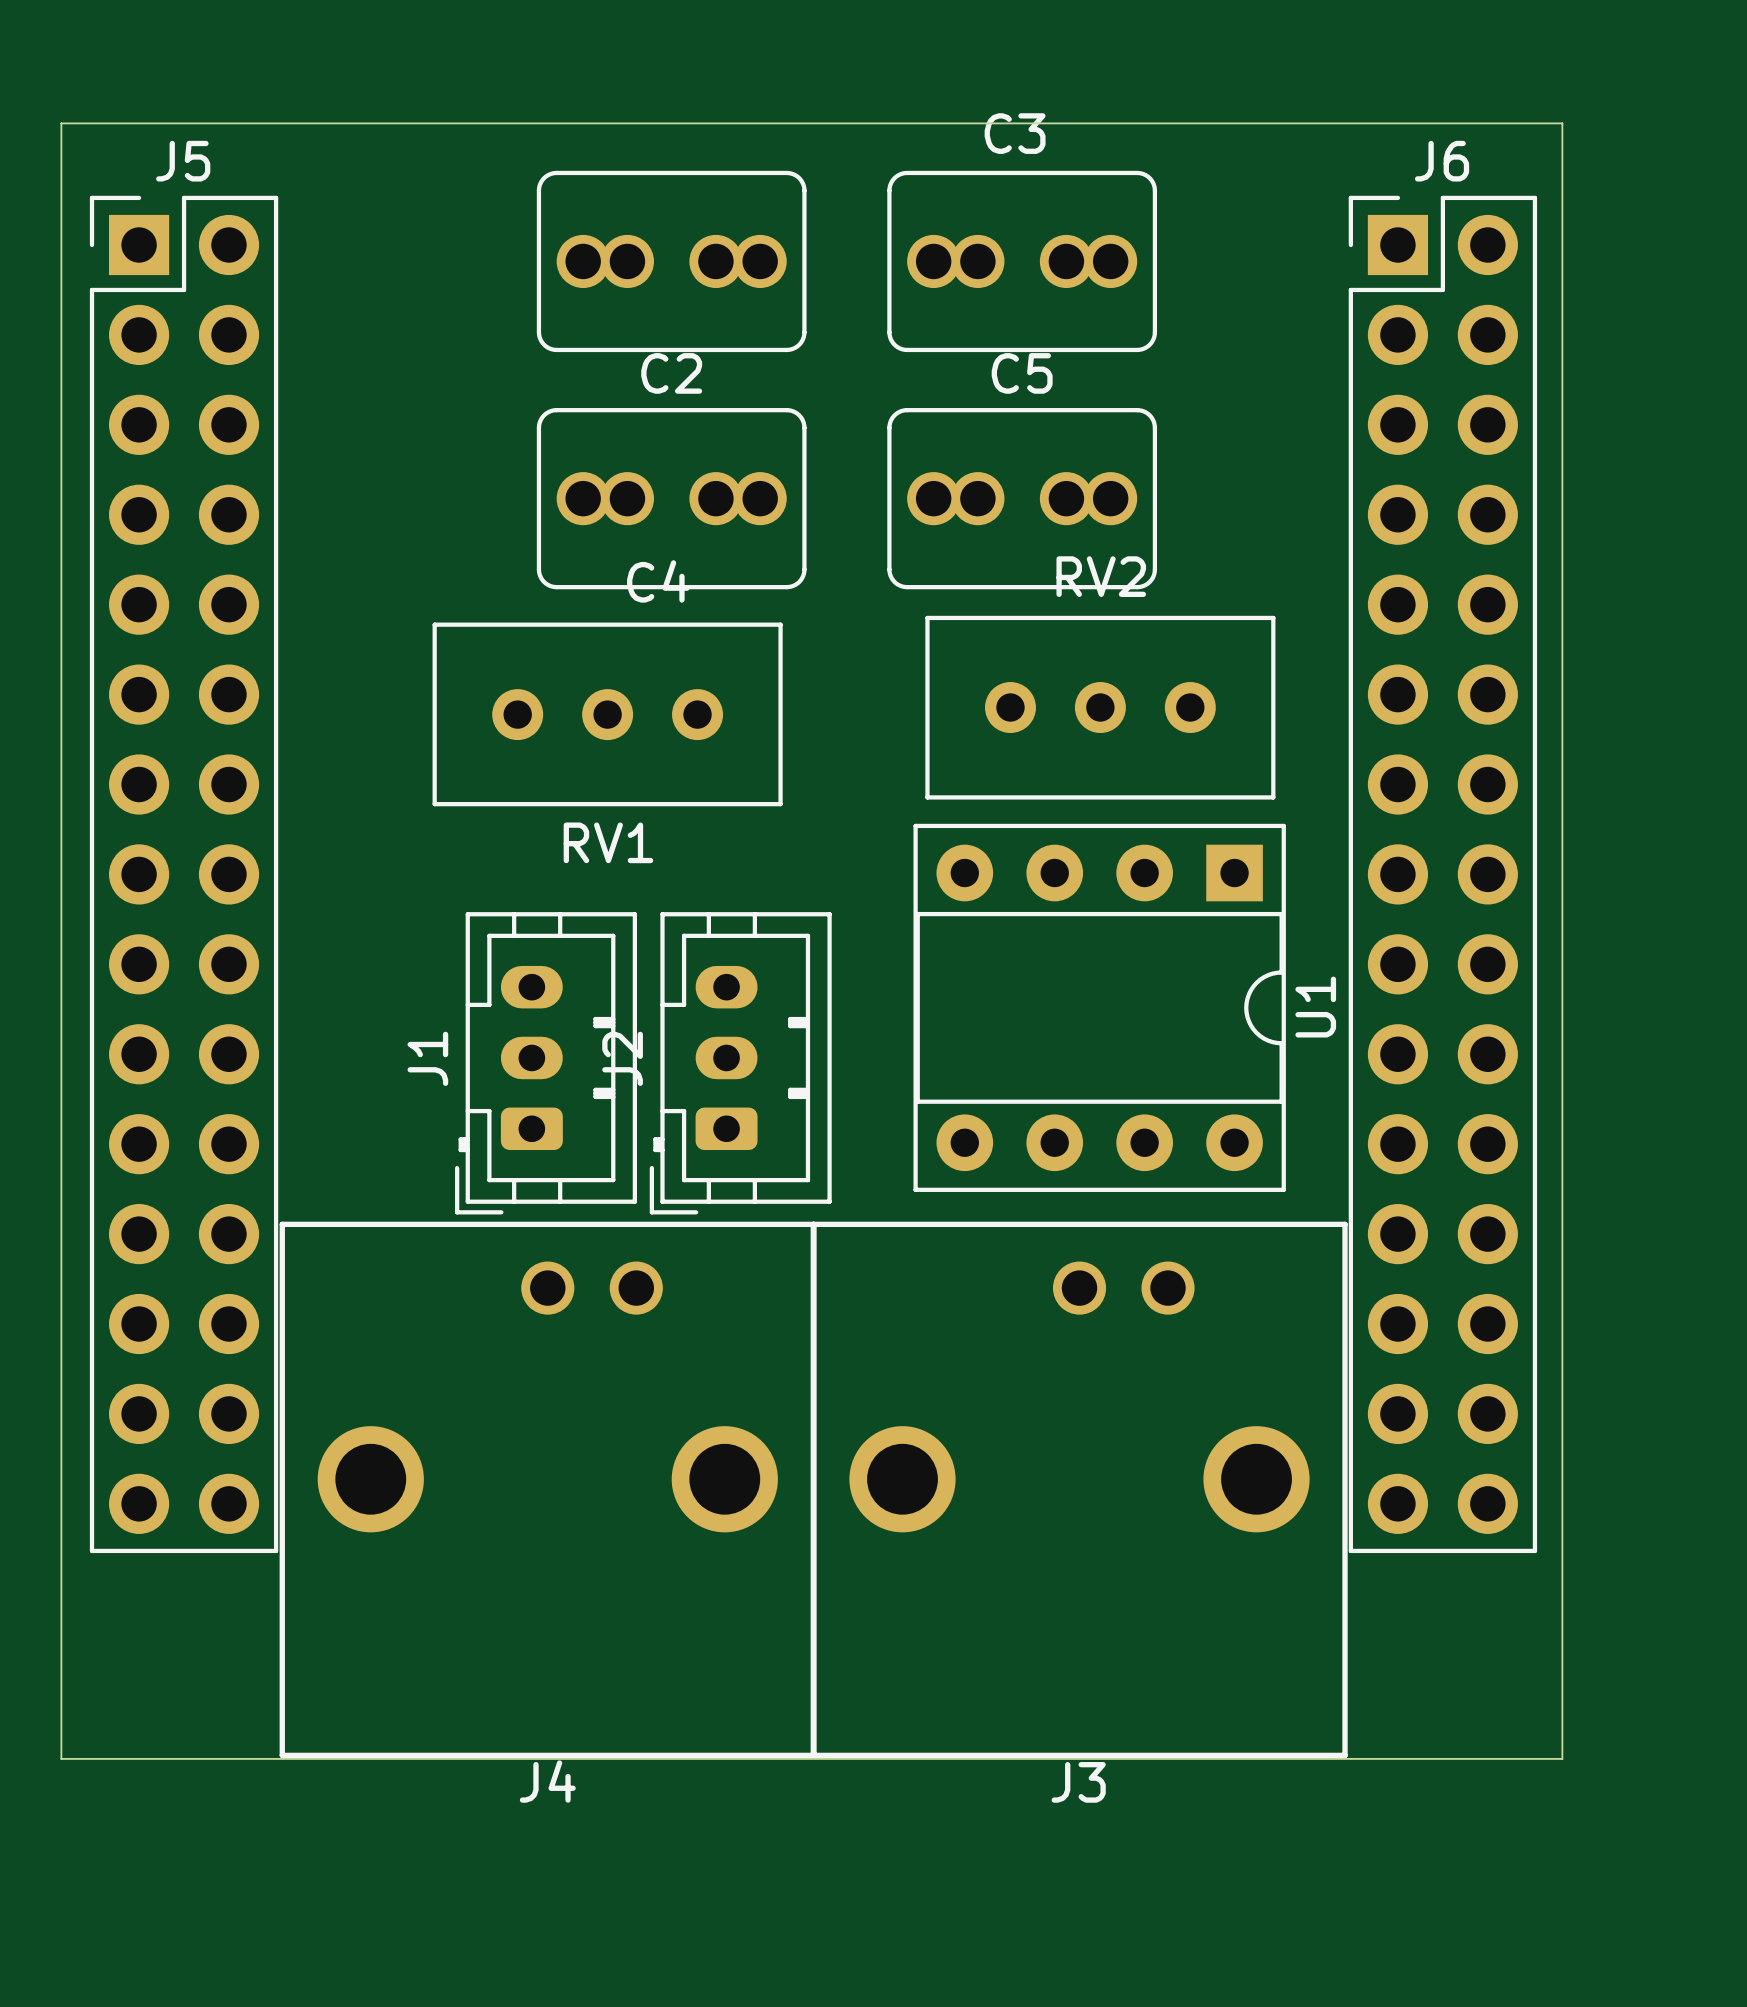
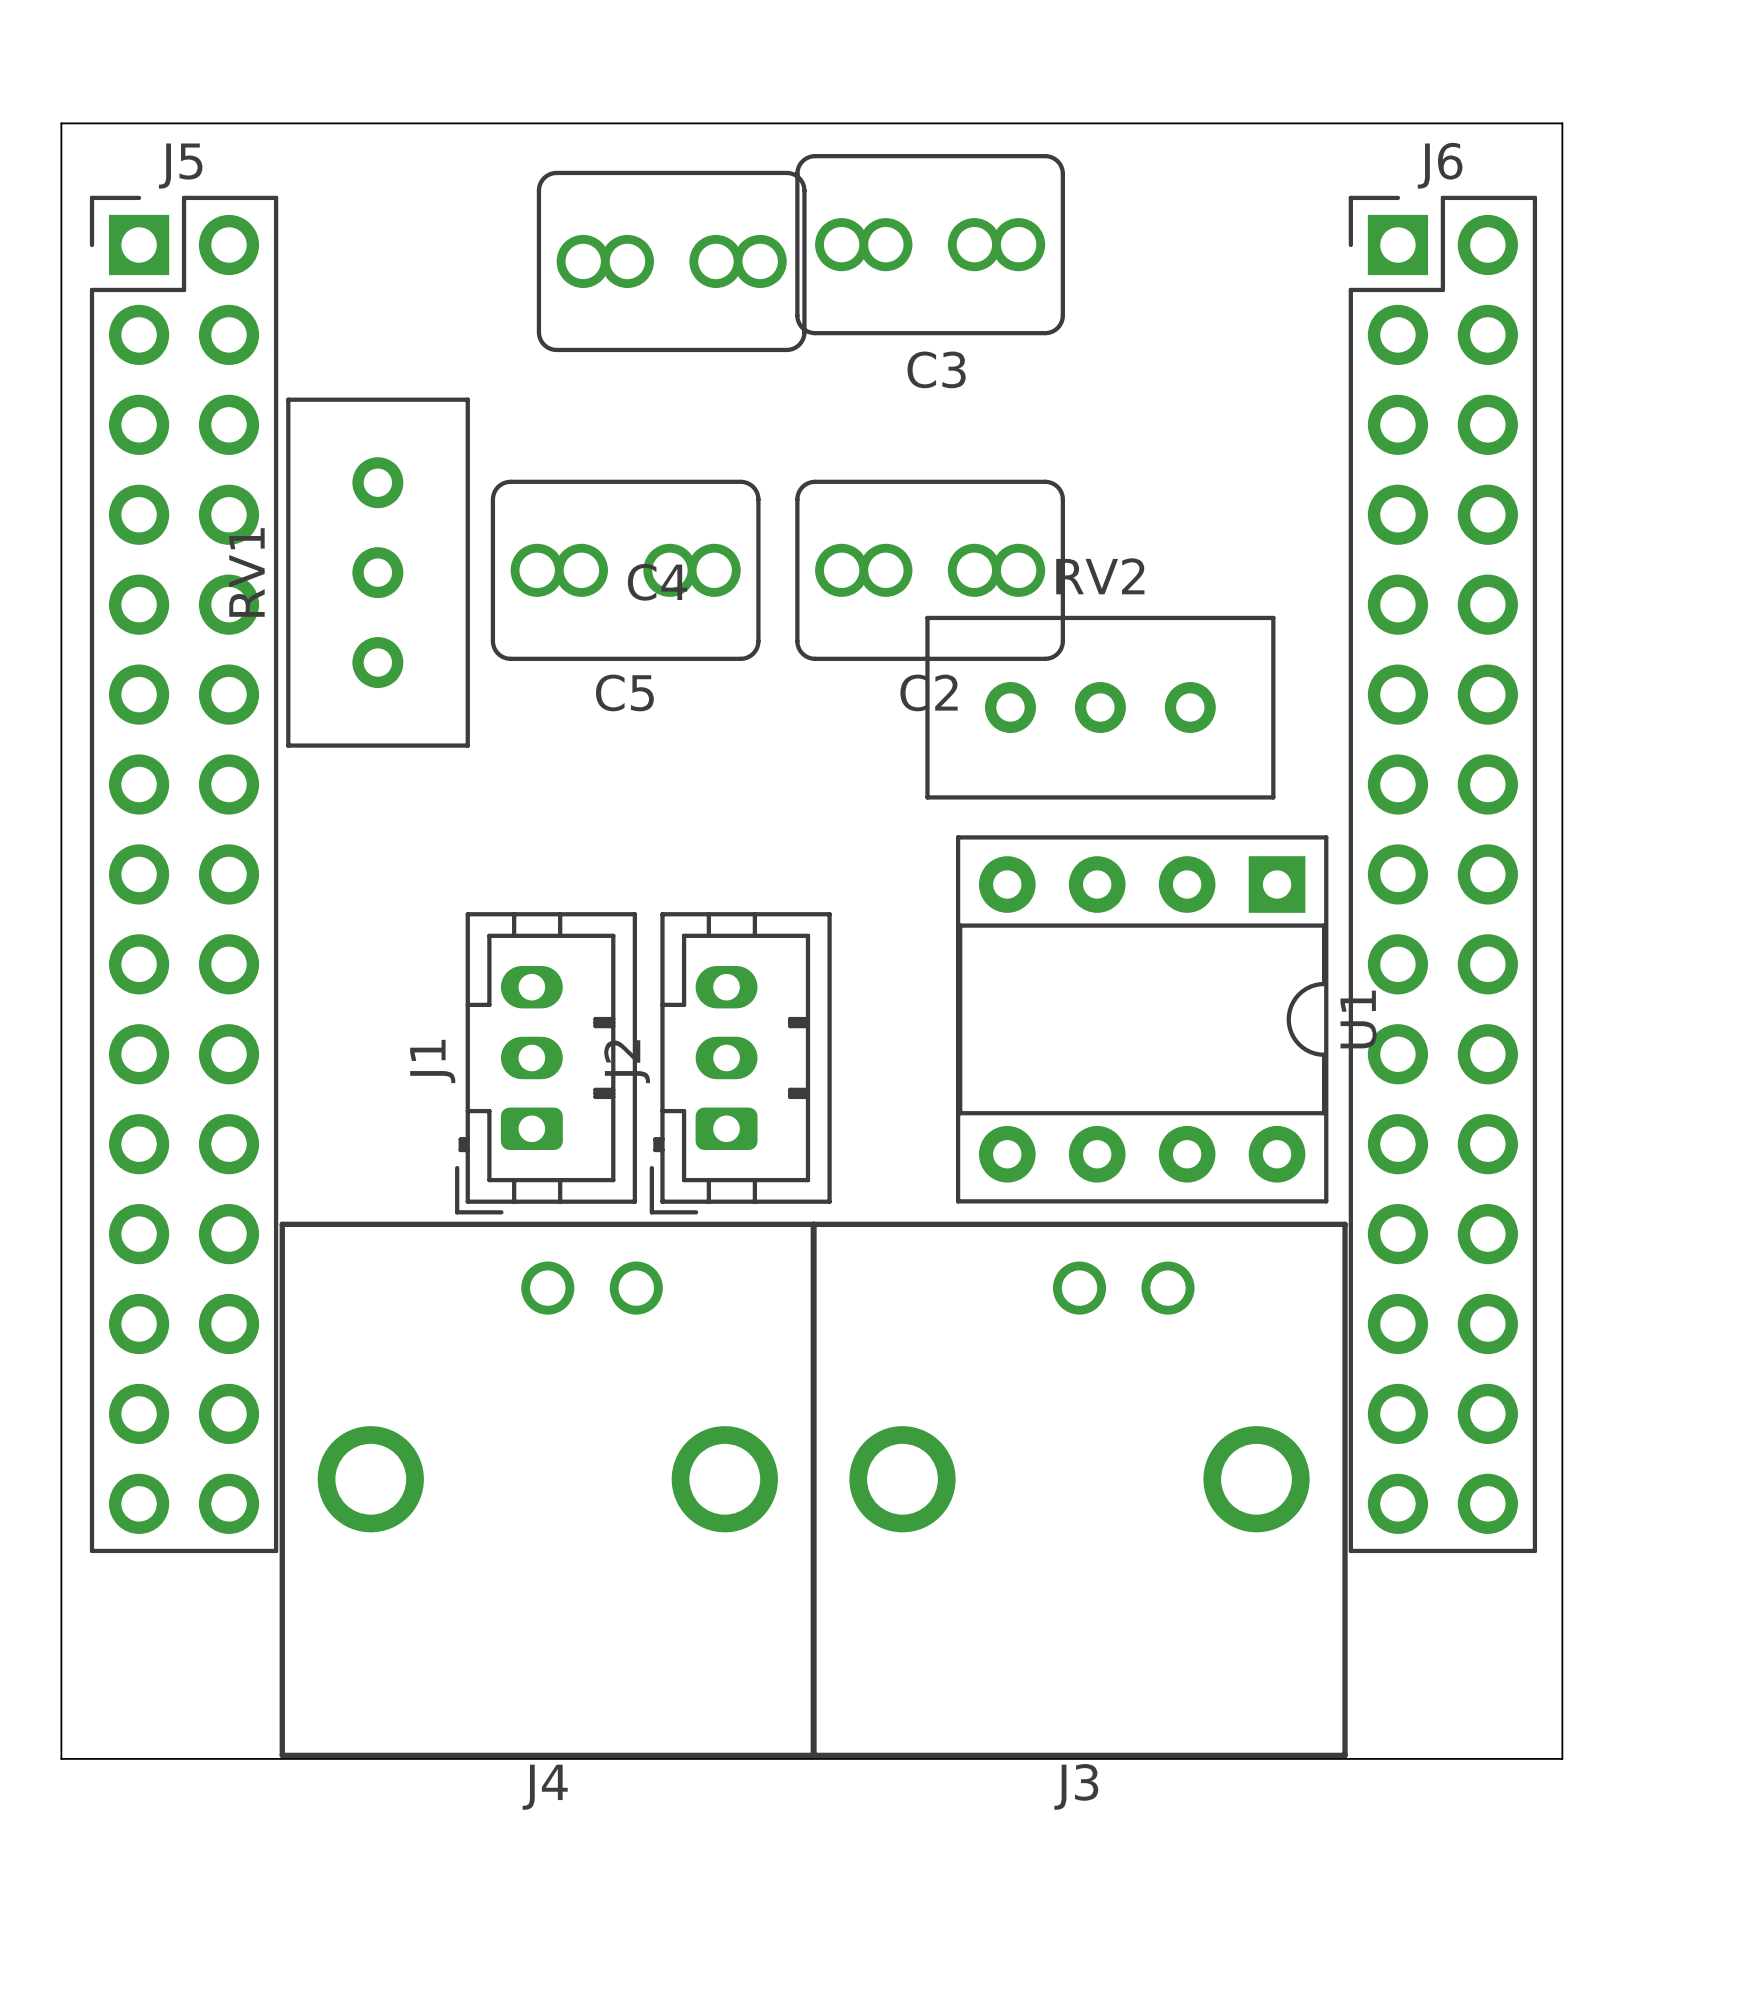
C3 name position: C3 (1015, 133) -> C3 (936, 369)
C3 position: (1022, 261) -> (930, 244)
C2 name position: C2 (671, 373) -> C2 (929, 692)
C5 name position: C5 (1022, 373) -> C5 (624, 692)
C2 position: (671, 498) -> (930, 570)
C5 position: (1022, 498) -> (625, 570)
RV1 rotation: 0° (607, 714) -> 90° clockwise (378, 572)
RV1 position: (607, 714) -> (378, 572)
U1 position: (1099, 1007) -> (1142, 1019)

